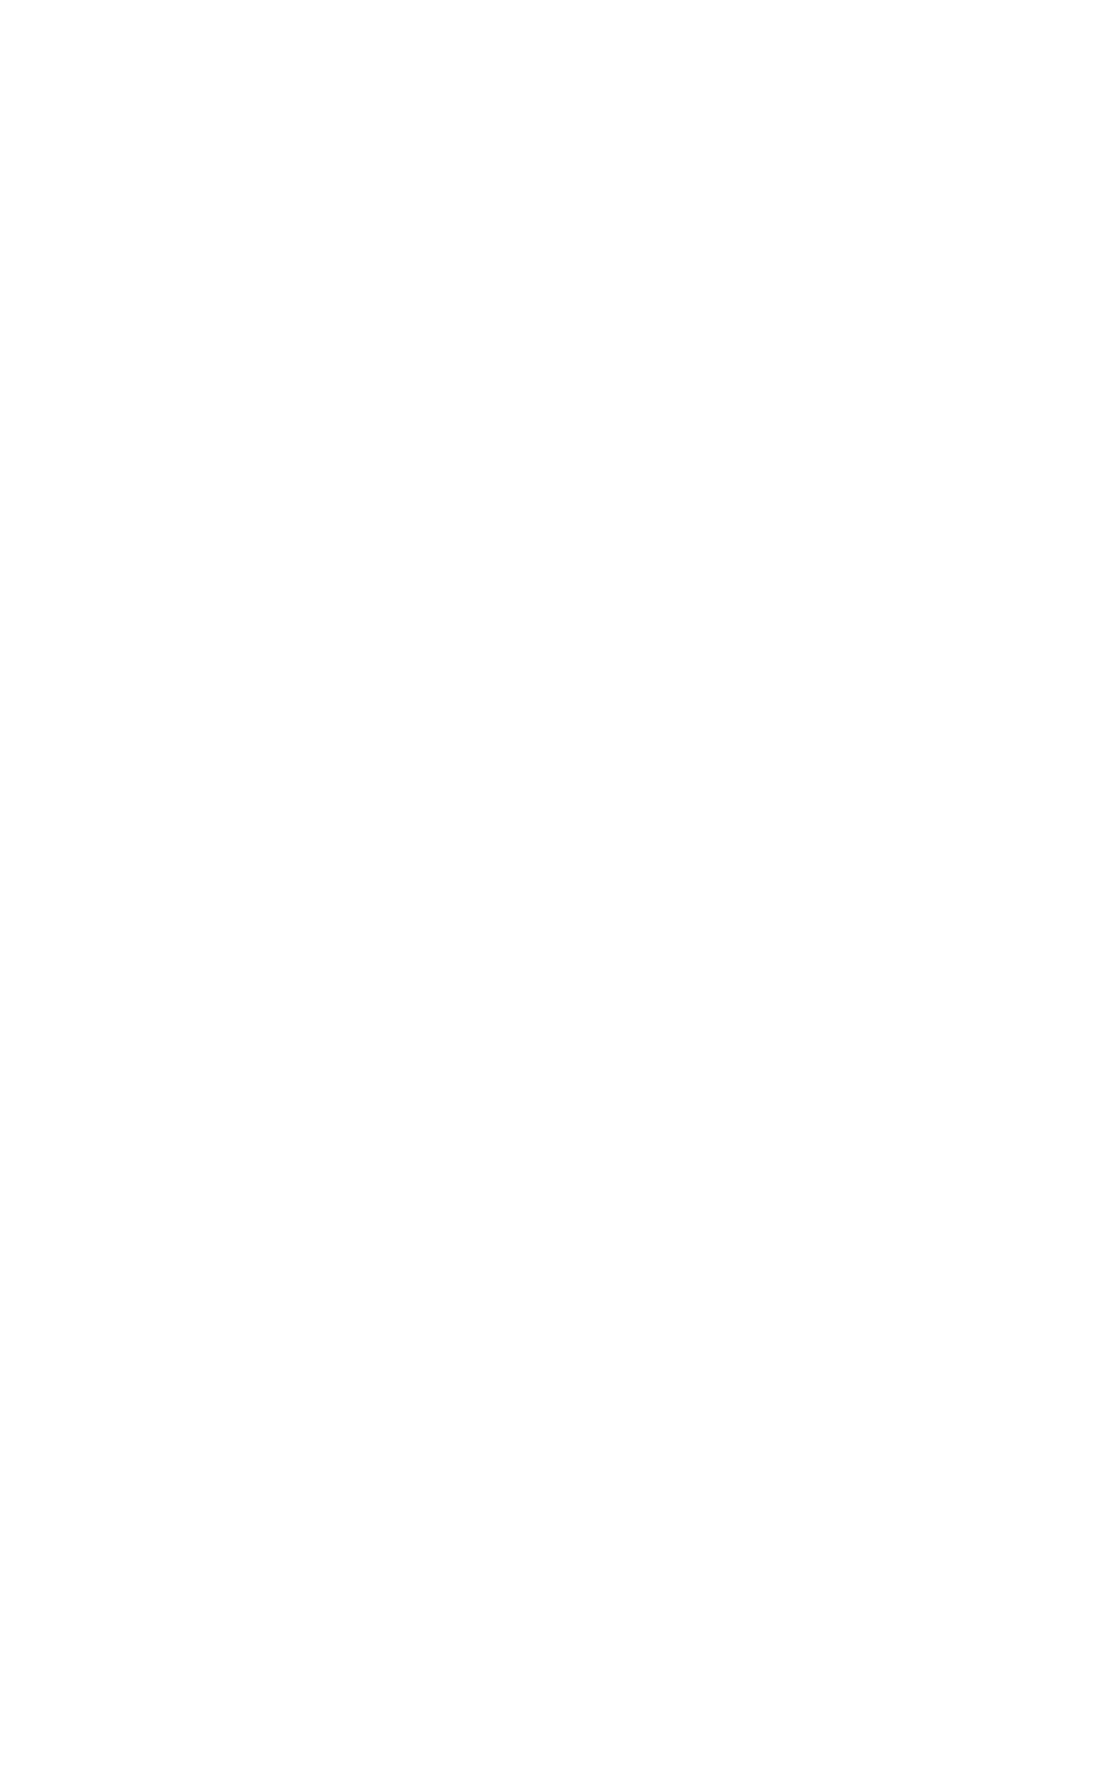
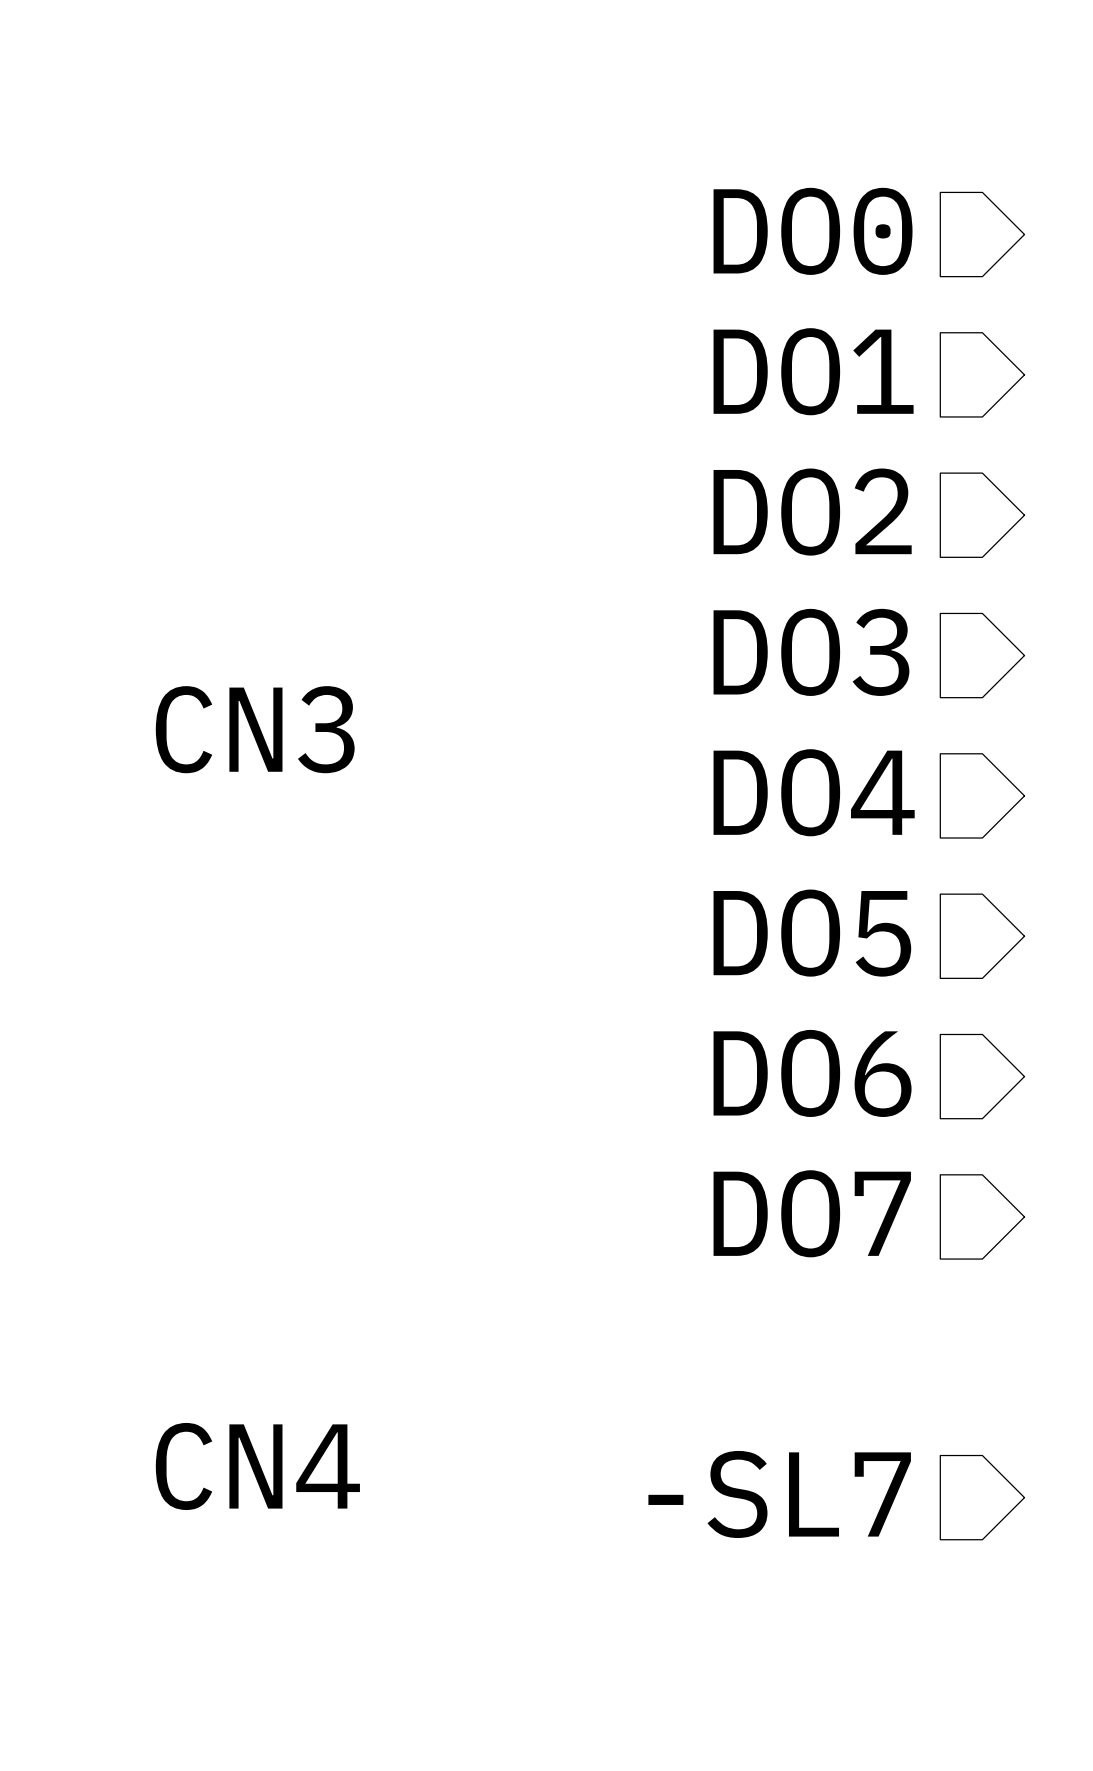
hierarchical label: none -> DO0 (813, 231)
hierarchical label: none -> DO1 (813, 371)
hierarchical label: none -> DO2 (812, 512)
hierarchical label: none -> DO3 (811, 652)
text: none -> CN3 (255, 729)
hierarchical label: none -> DO4 (814, 792)
hierarchical label: none -> DO5 (812, 933)
hierarchical label: none -> DO6 (812, 1073)
hierarchical label: none -> DO7 (812, 1213)
text: none -> CN4 (257, 1466)
hierarchical label: none -> -SL7 (779, 1494)

